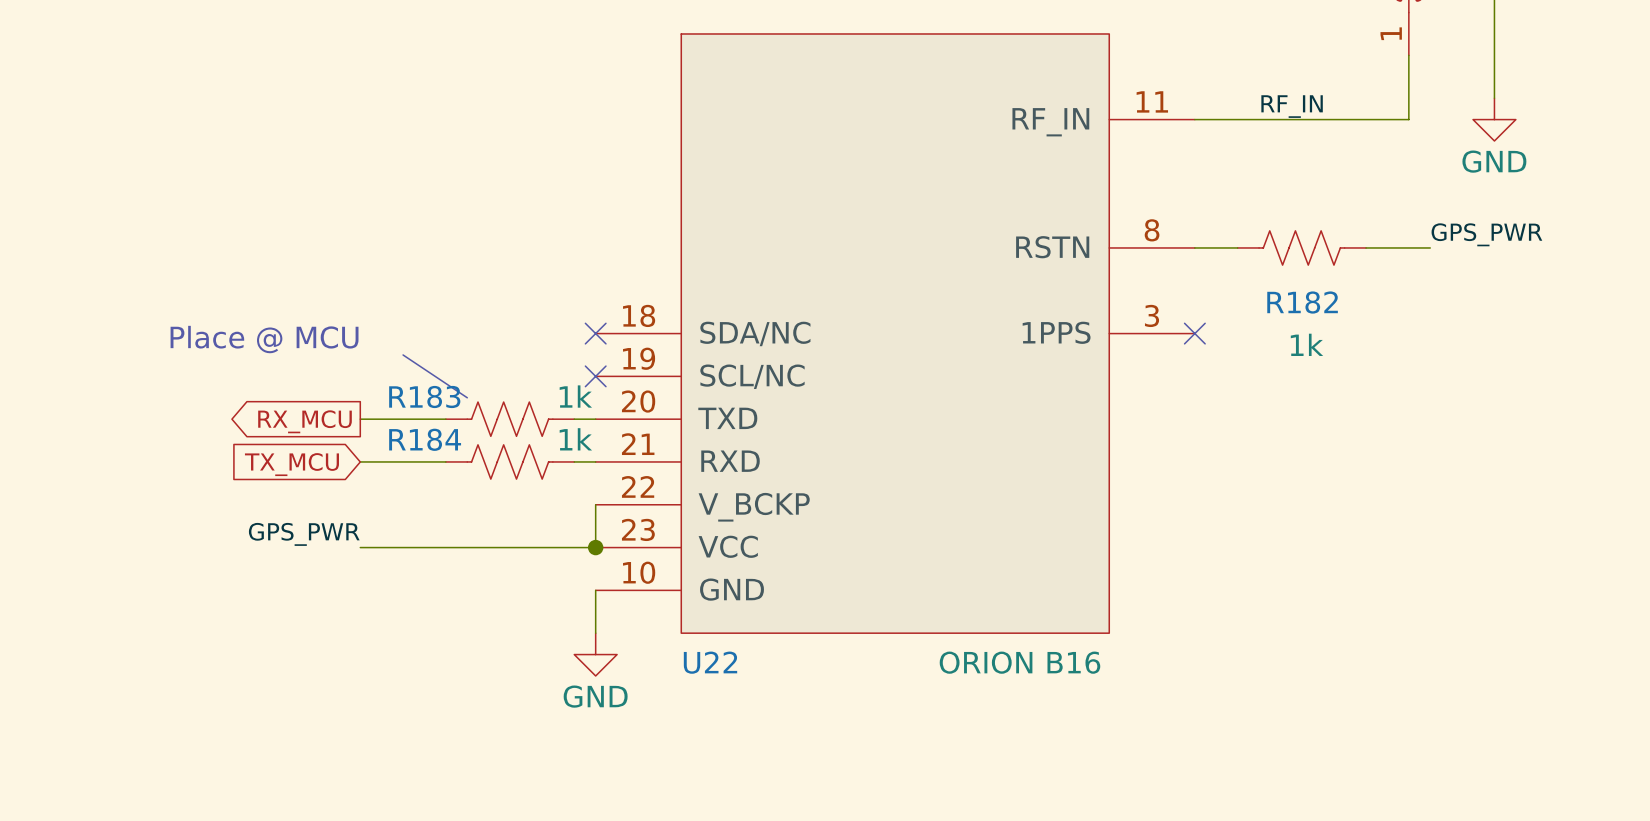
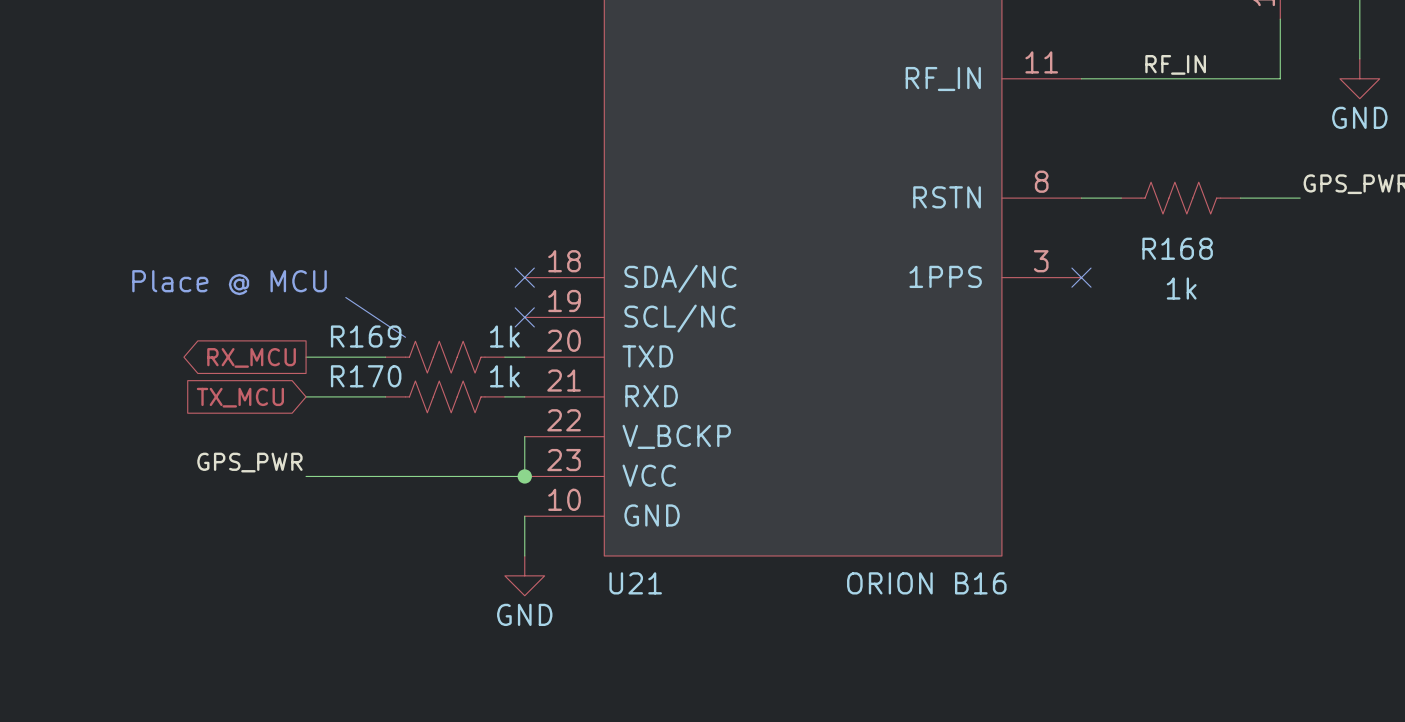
R182 name: R182 (1302, 302) -> R168 (1177, 248)
R183 name: R183 (424, 396) -> R169 (366, 336)
R184 name: R184 (425, 439) -> R170 (366, 376)
U22 name: U22 (710, 662) -> U21 (635, 583)

